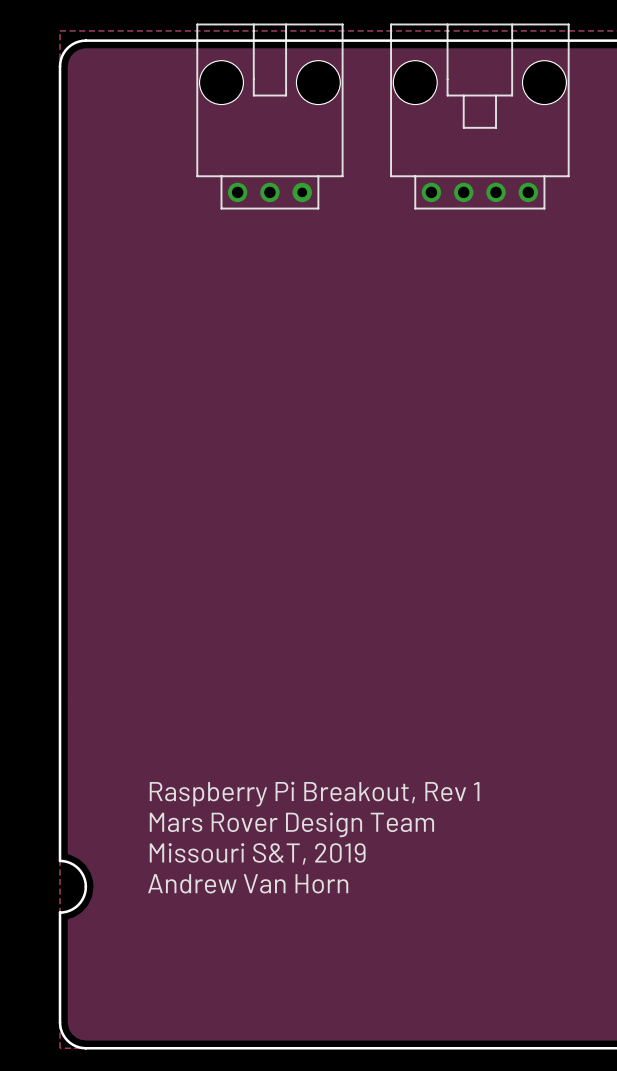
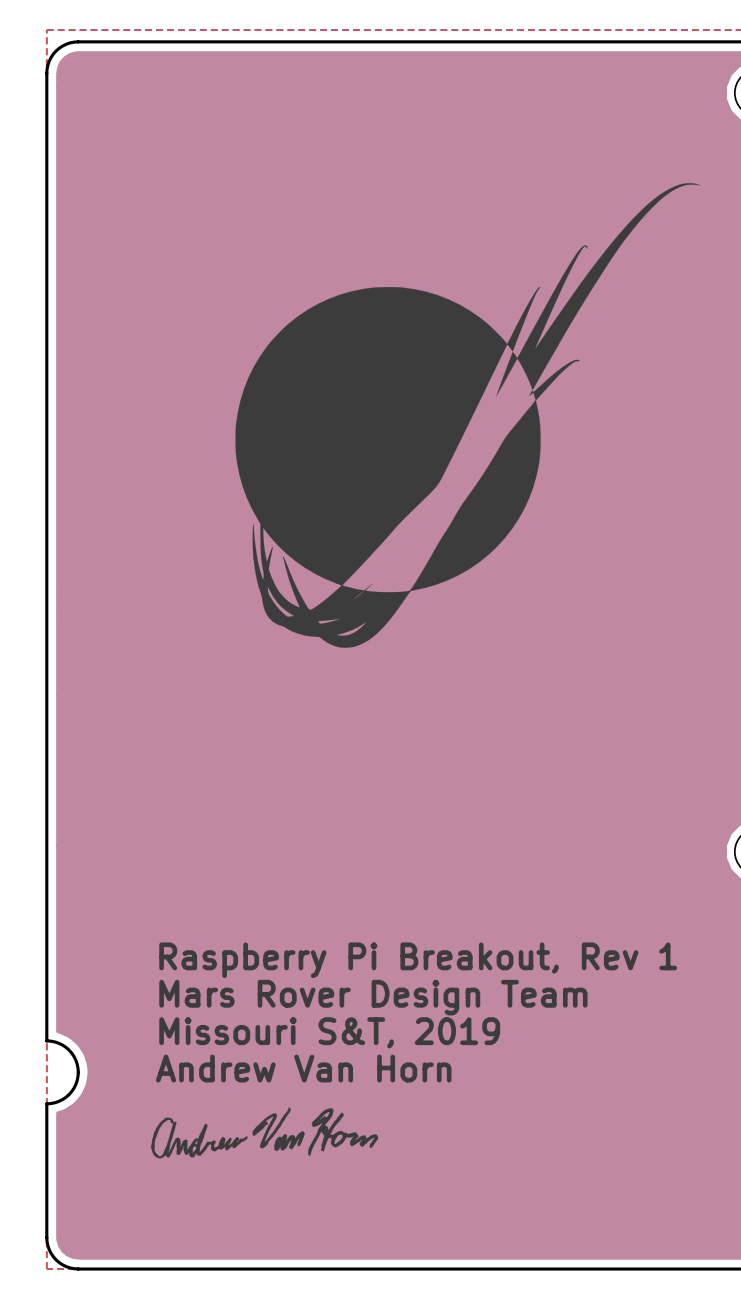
part: (269, 116) -> none
part: (479, 116) -> none
drawing: none -> [235, 183, 700, 648]
drawing: none -> [150, 1107, 379, 1159]

